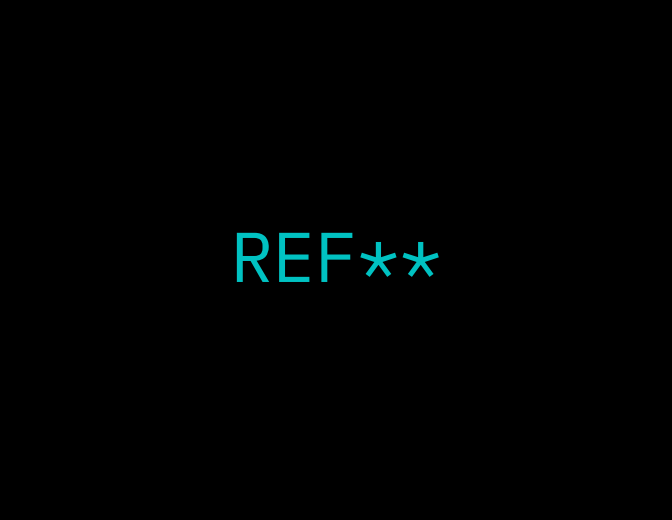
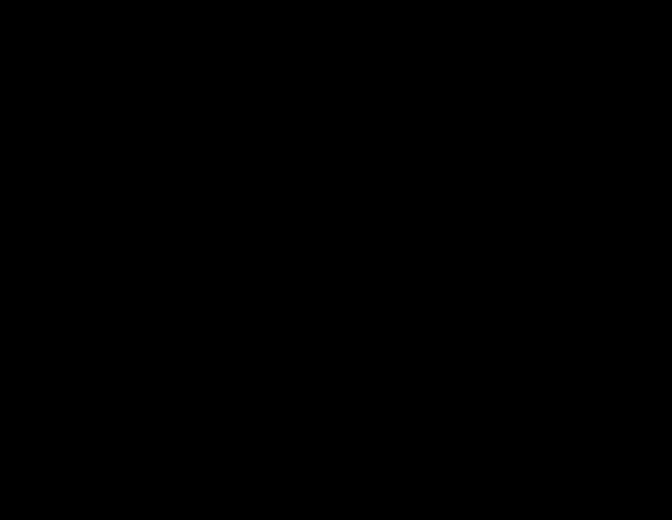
REF**: (337, 257) -> none

